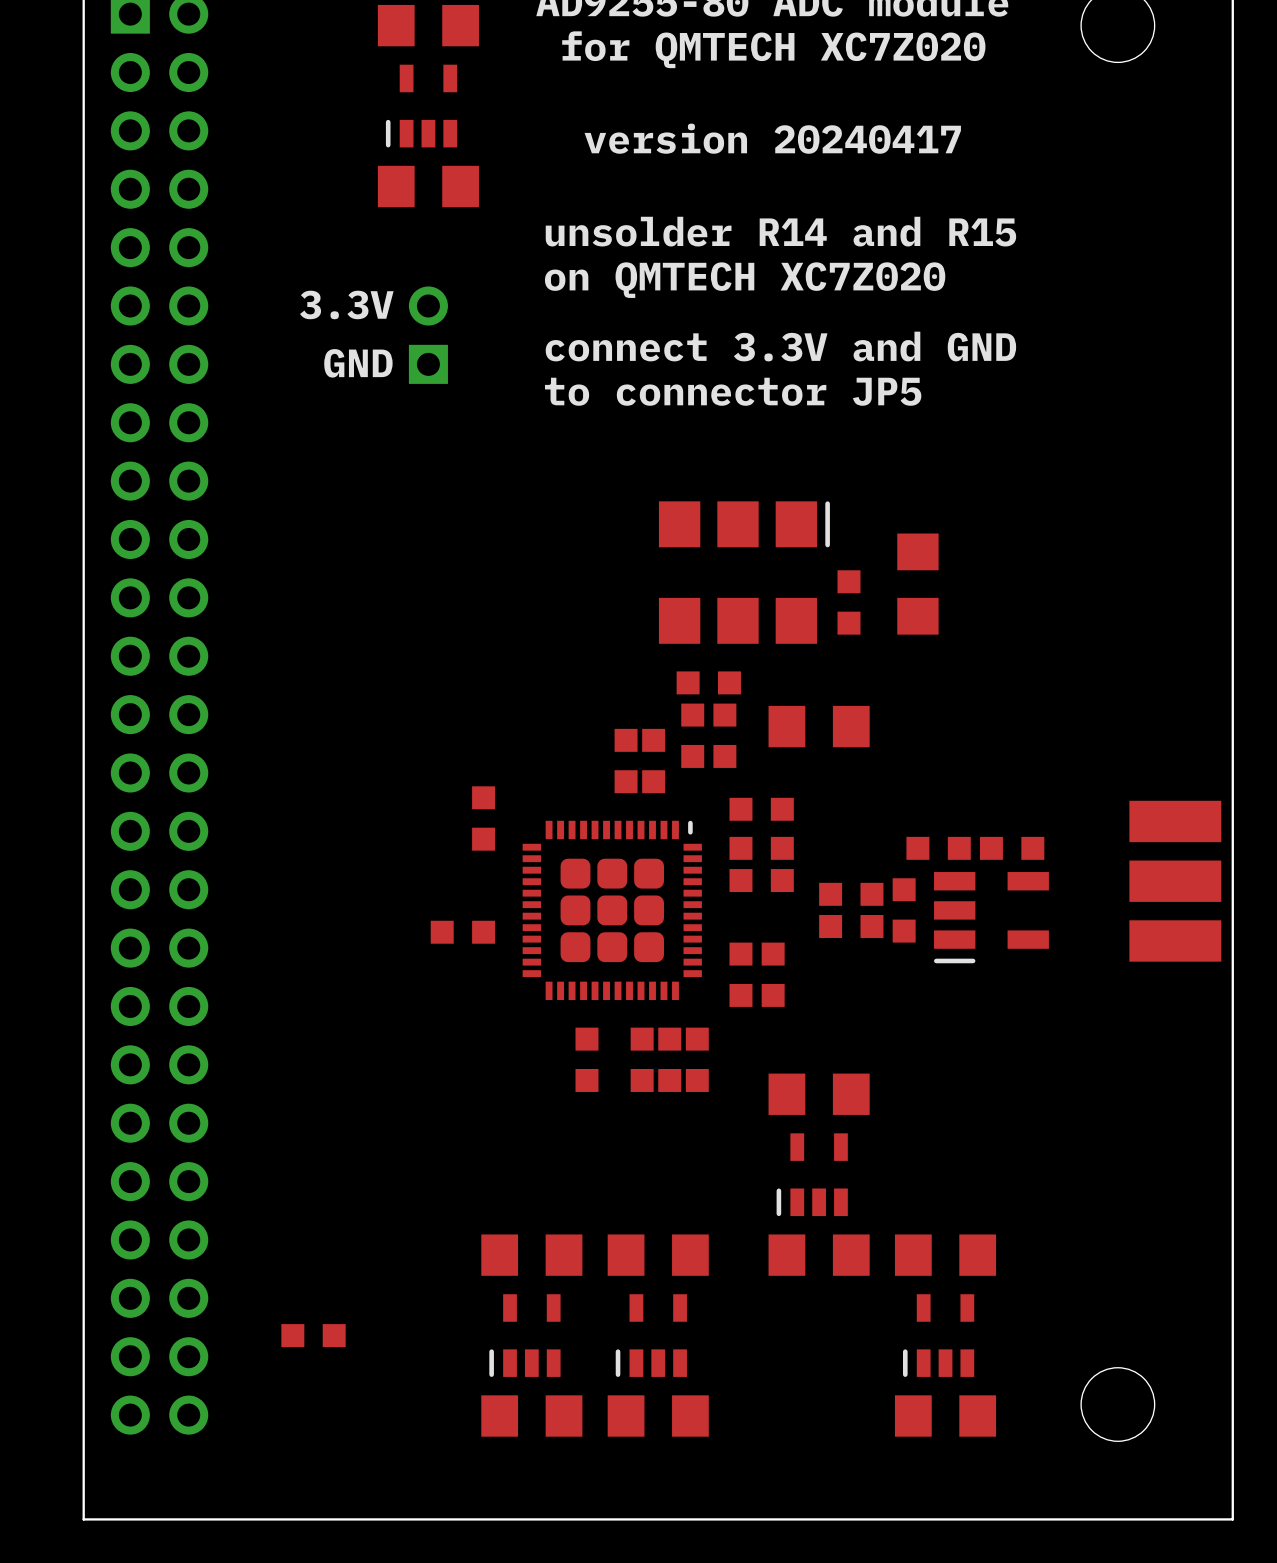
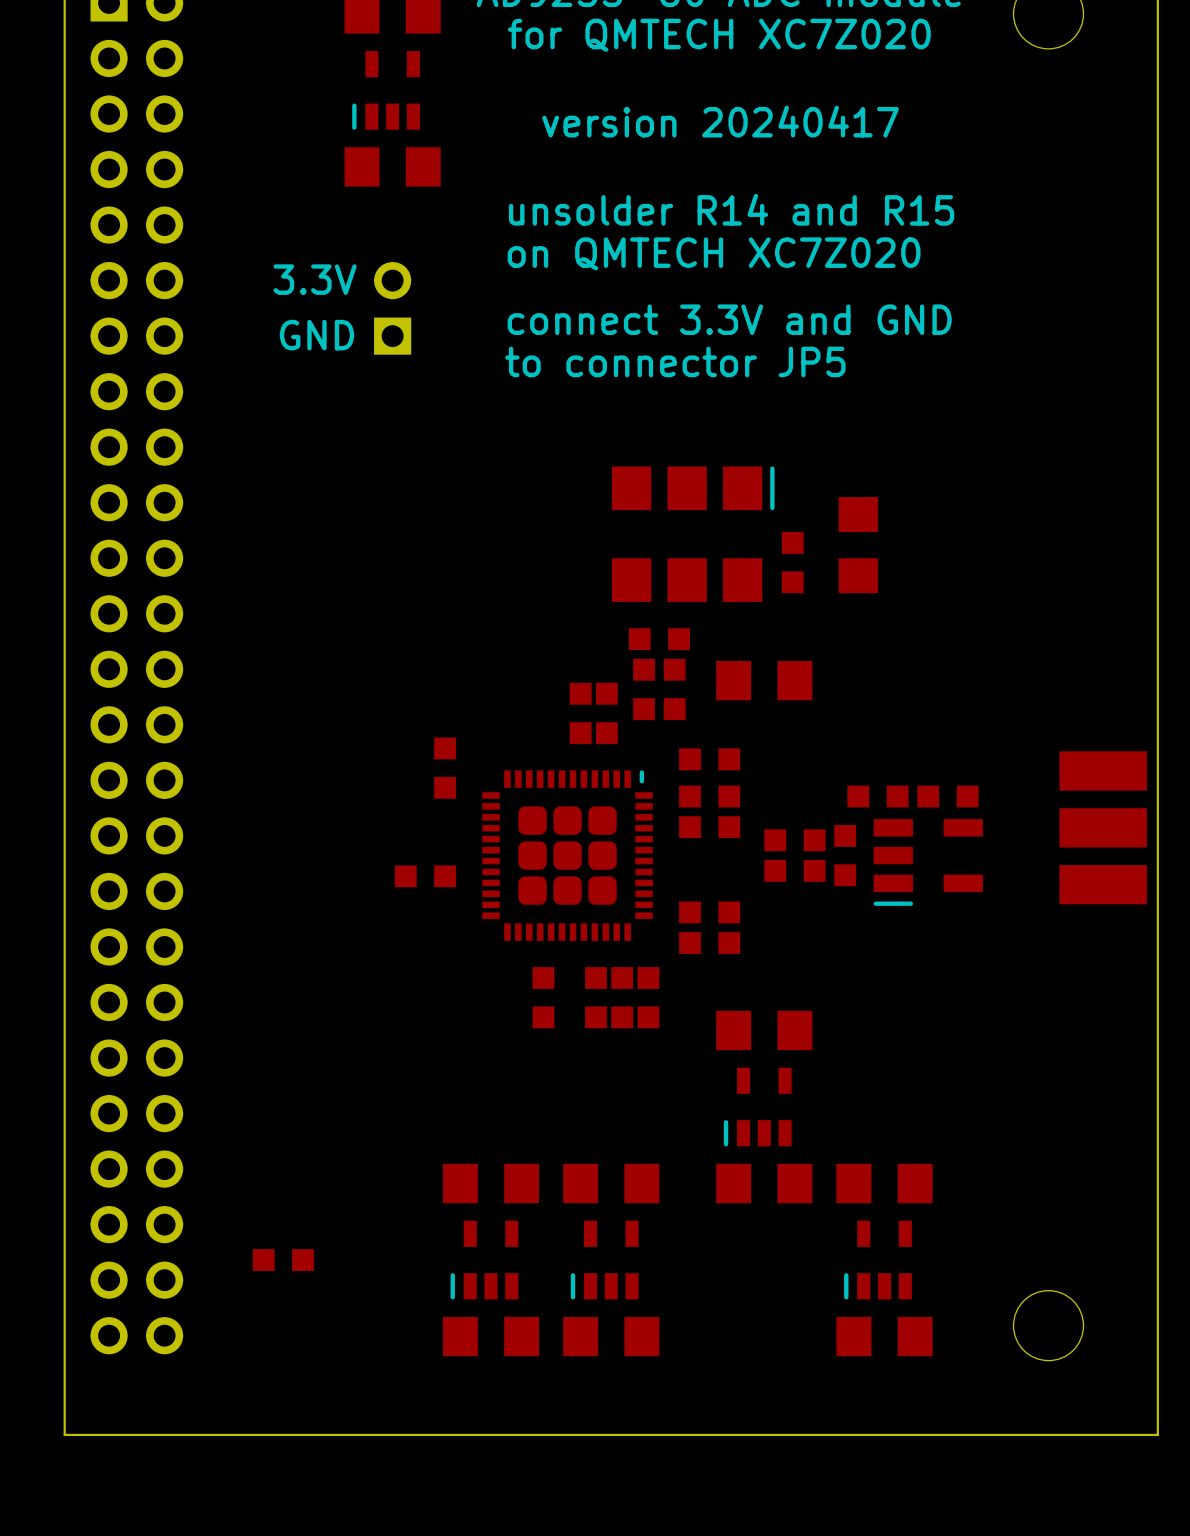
part: none -> (709, 912)
part: (740, 974) -> none
part: (773, 974) -> none
part: none -> (709, 943)

